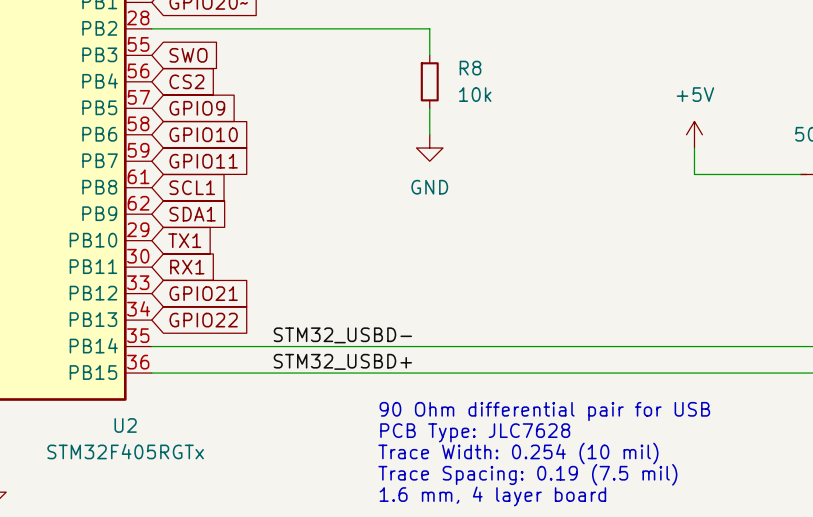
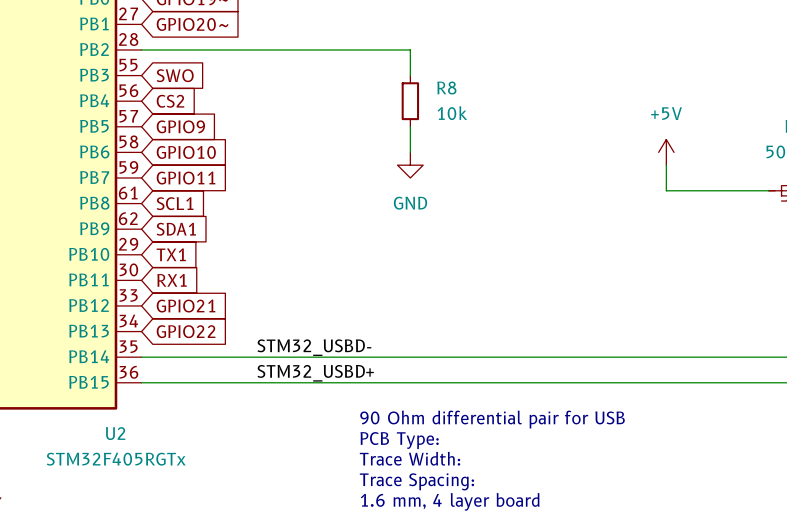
text: PCB Type: JLC7628 (475, 432) -> PCB Type: (399, 440)
text: Trace Width: 0.254 (10 mil) (518, 453) -> Trace Width: (410, 458)
text: Trace Spacing: 0.19 (7.5 mil) (527, 474) -> Trace Spacing: (416, 481)

